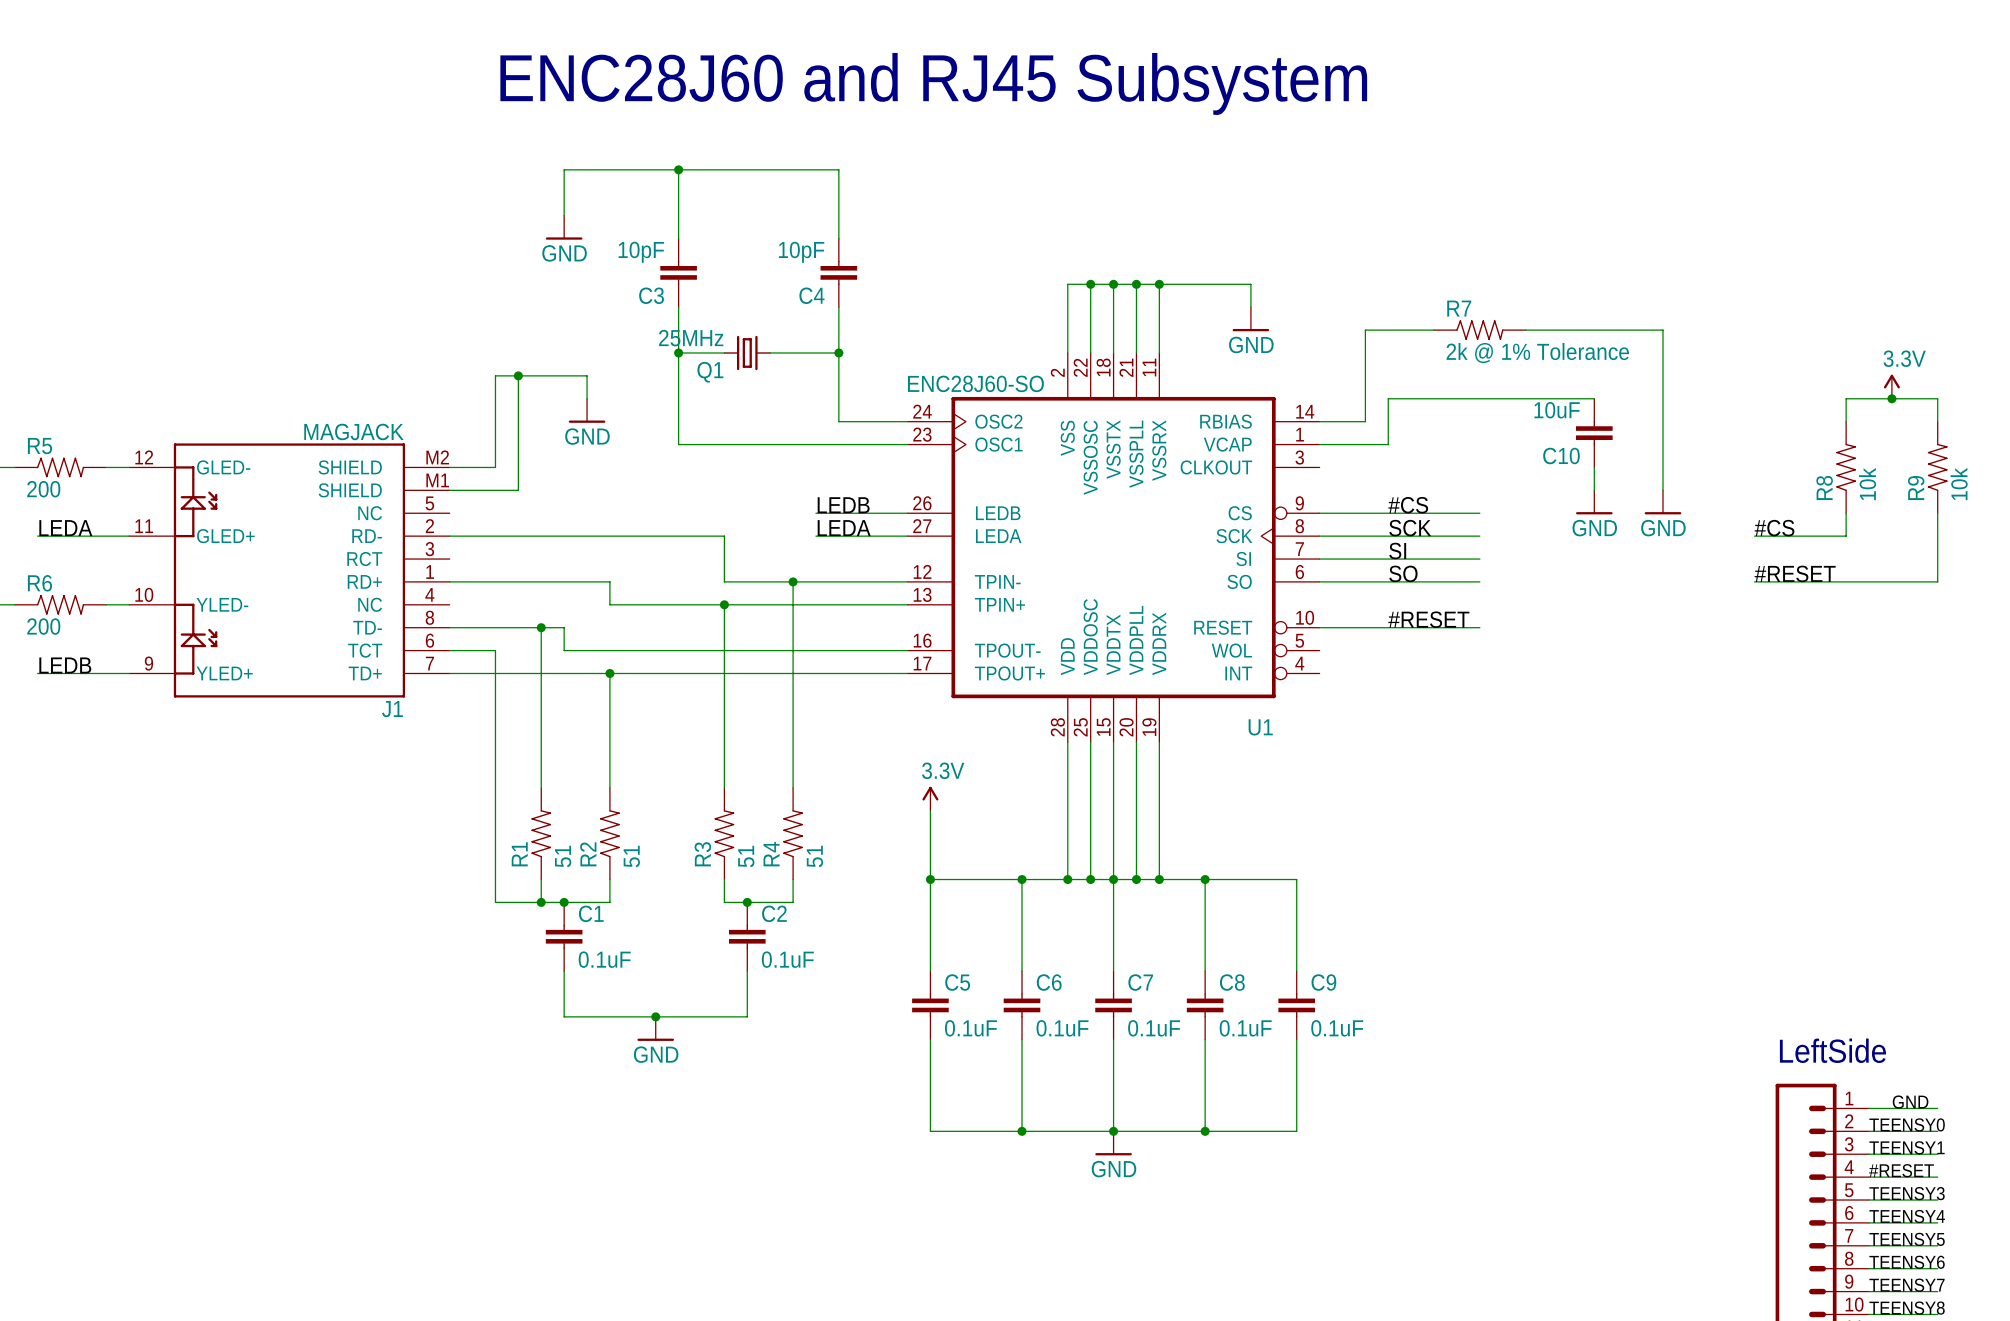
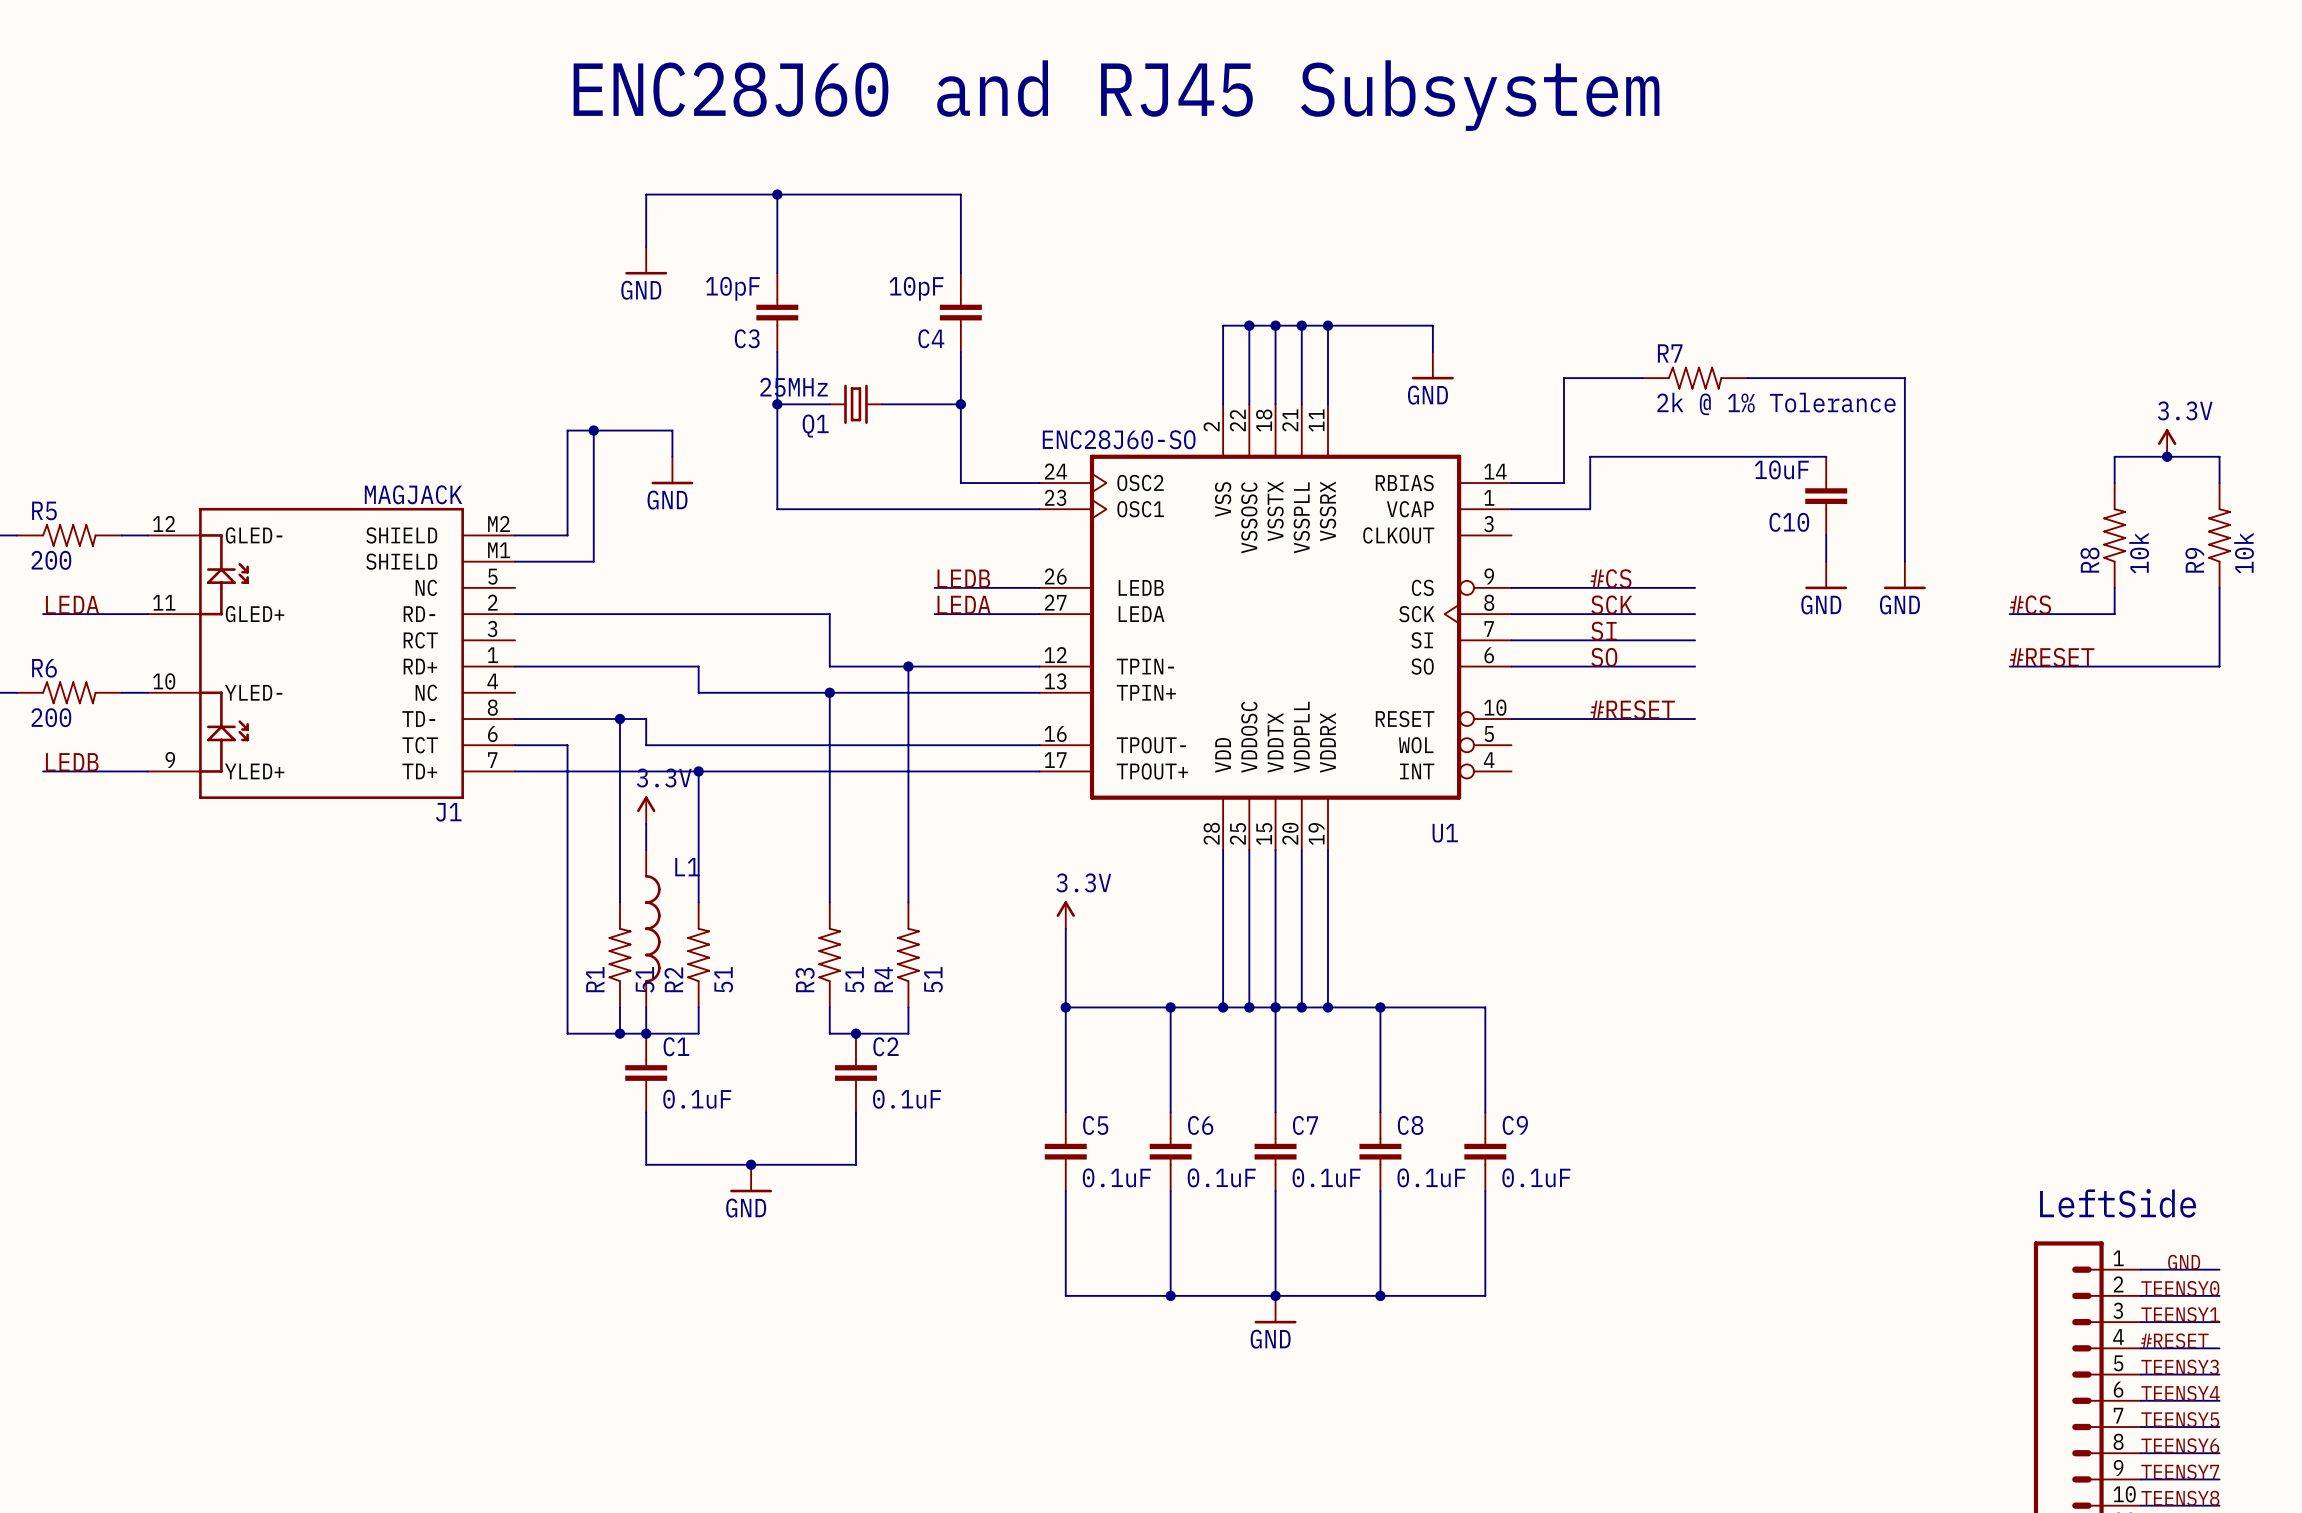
power symbol: none -> 3.3V (646, 810)
wire: none -> (646, 823) (646, 850)
L1: none -> (652, 928)
wire: none -> (646, 1007) (646, 1033)

